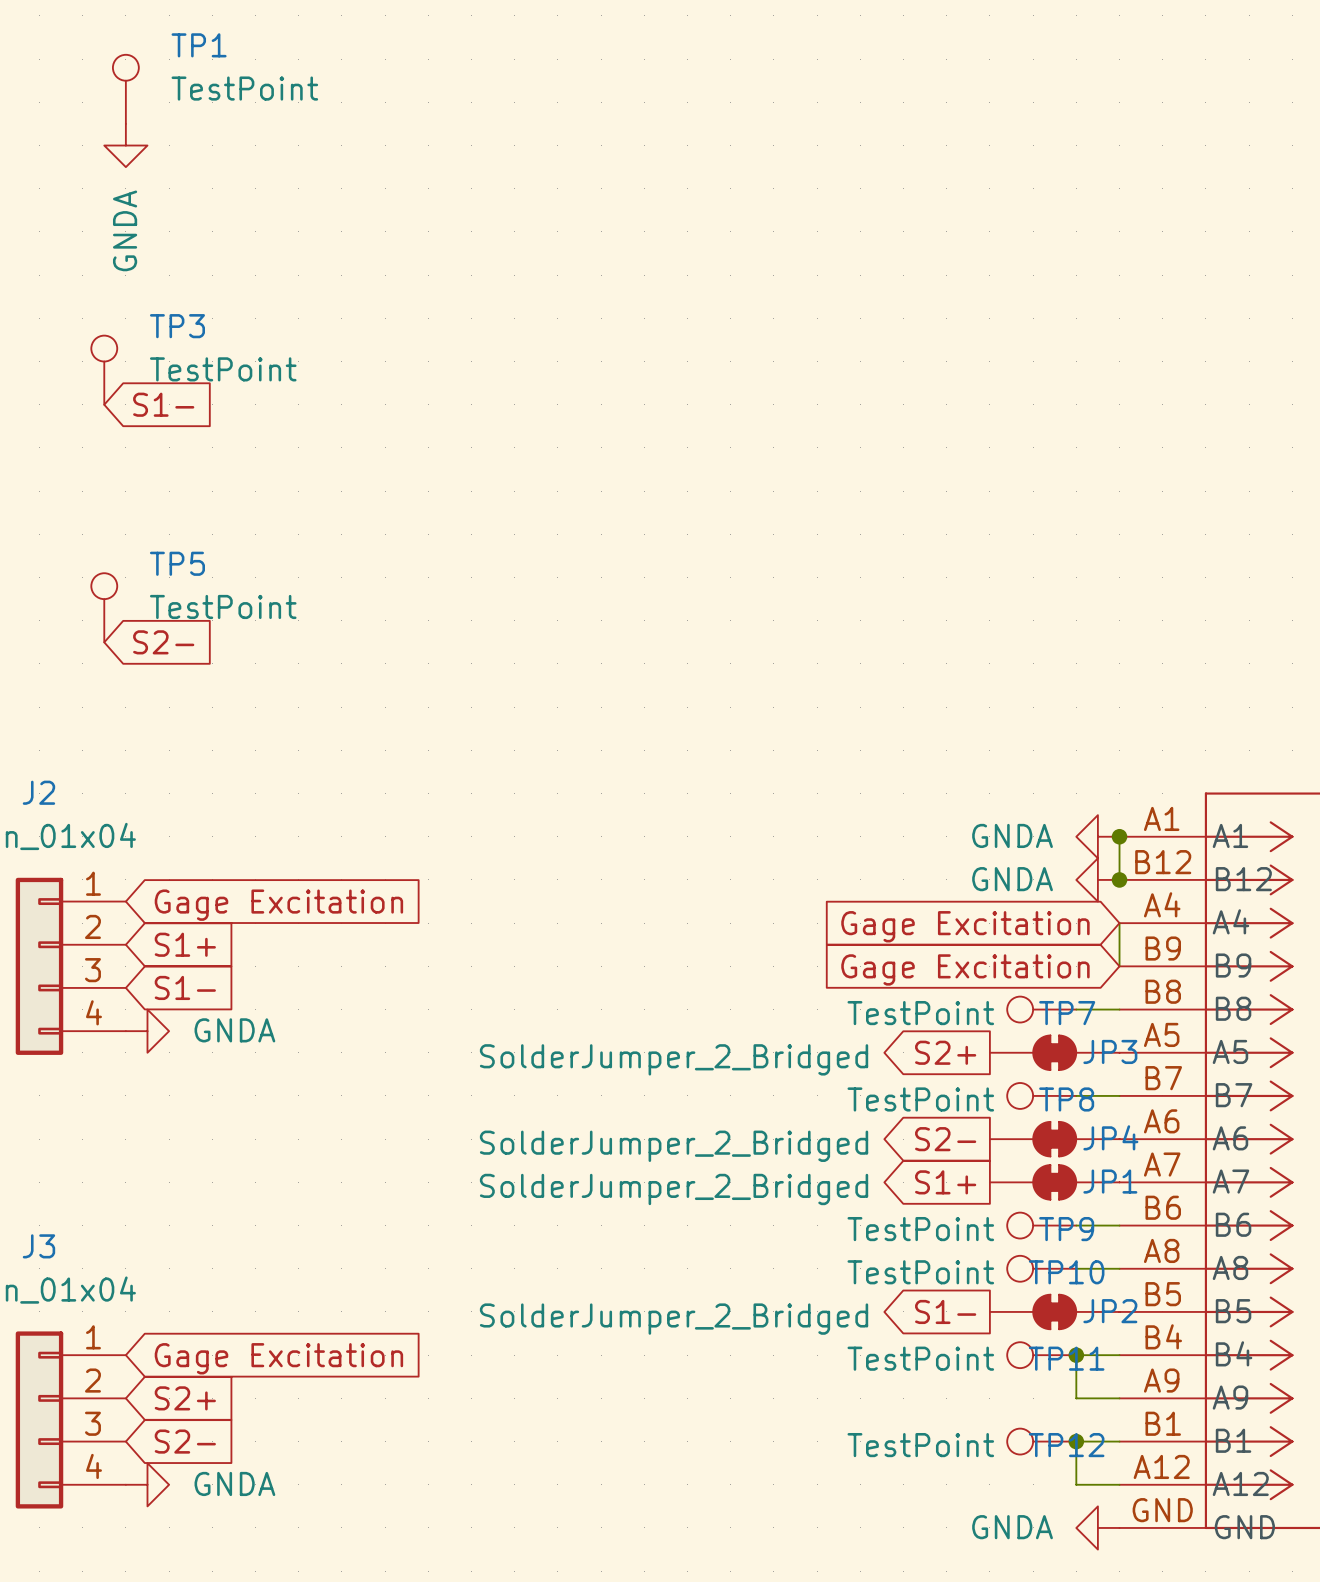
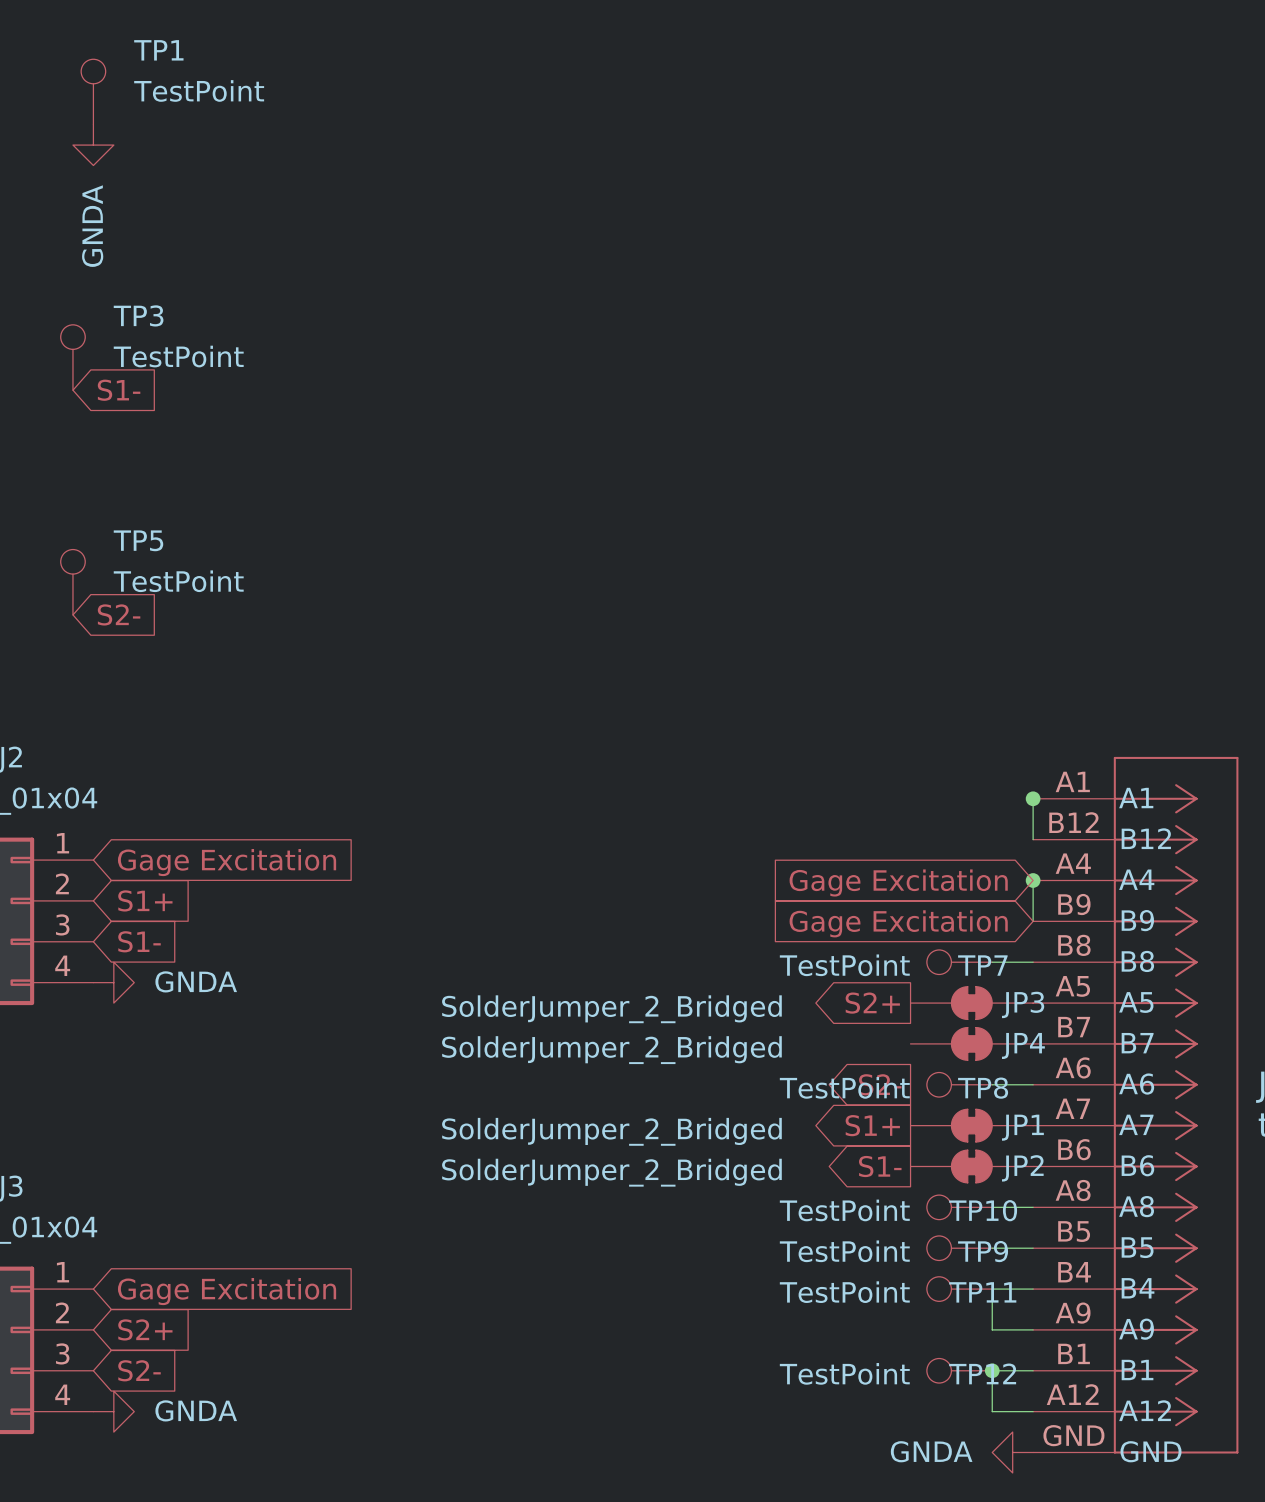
power symbol: GNDA (1097, 836) -> none
power symbol: GNDA (1097, 879) -> none
junction position: (1119, 879) -> (1033, 880)
TP8 position: (1041, 1095) -> (959, 1084)
JP4 position: (1054, 1139) -> (971, 1043)
TP9 position: (1041, 1225) -> (959, 1248)
global label position: S1- (945, 1311) -> S1- (880, 1166)
JP2 position: (1054, 1311) -> (971, 1166)
junction: (1076, 1355) -> none

